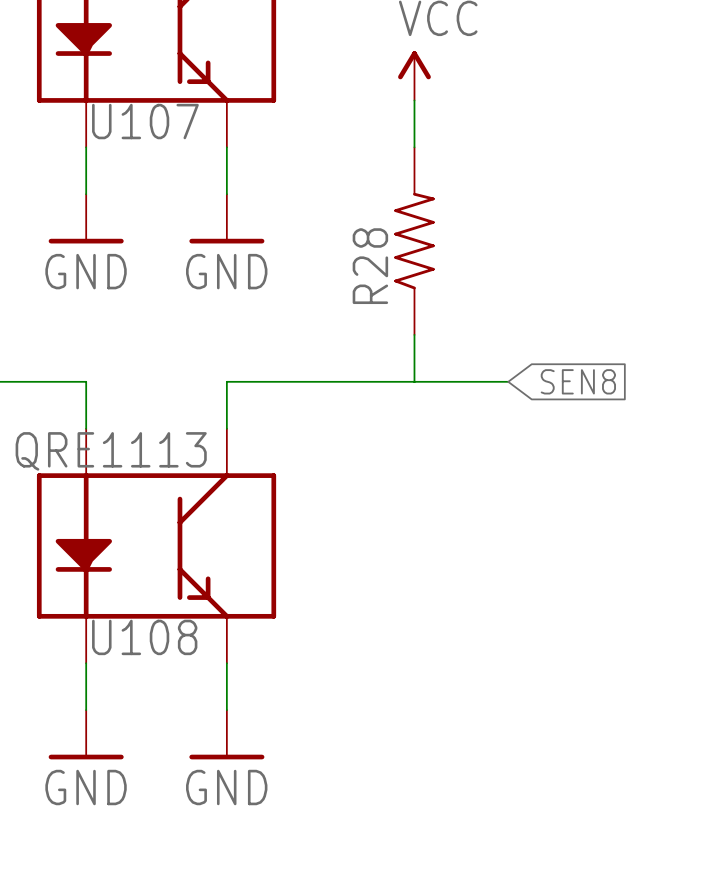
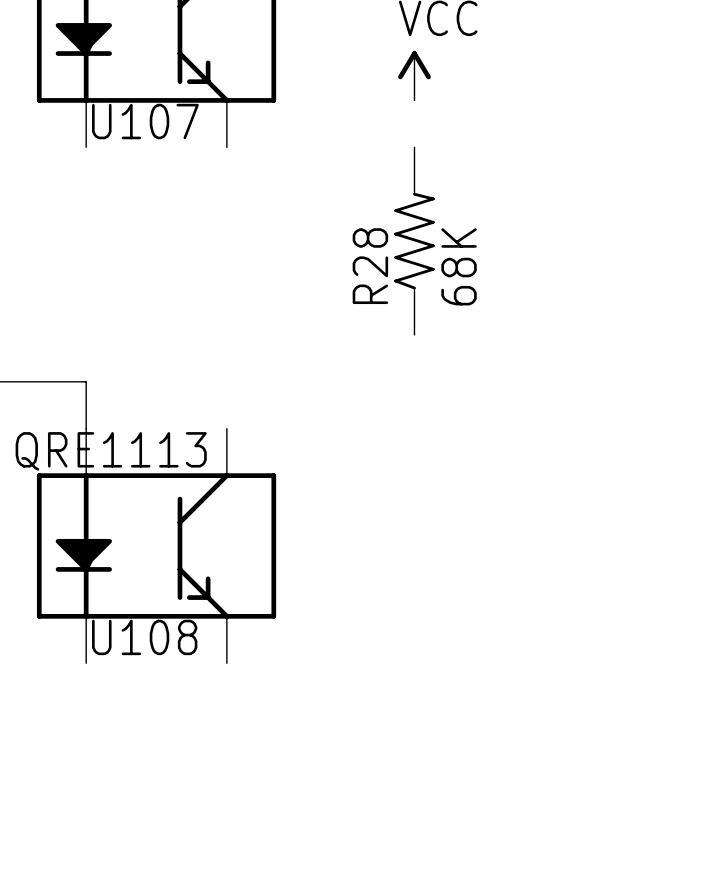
wire: (414, 100) (414, 147) -> none
wire: (86, 147) (86, 194) -> none
wire: (226, 147) (226, 194) -> none
power symbol: GND (86, 218) -> none
power symbol: GND (226, 218) -> none
R28 value: none -> 68K (459, 266)
wire: (414, 334) (414, 381) -> none
wire: (508, 381) (226, 381) (226, 428) -> none
global label: SEN8 (578, 381) -> none
wire: (86, 663) (86, 710) -> none
wire: (226, 663) (226, 710) -> none
power symbol: GND (86, 734) -> none
power symbol: GND (226, 734) -> none

